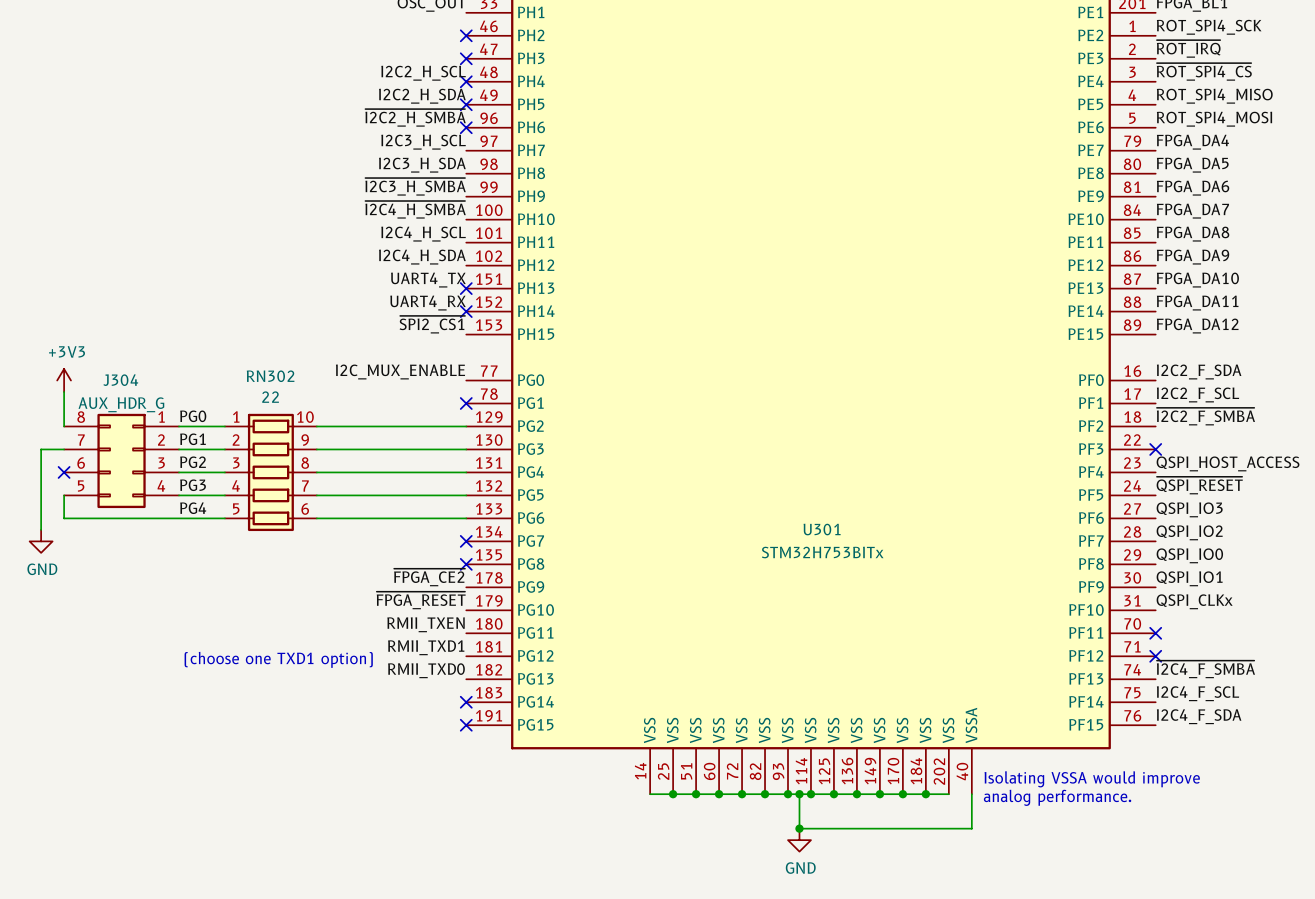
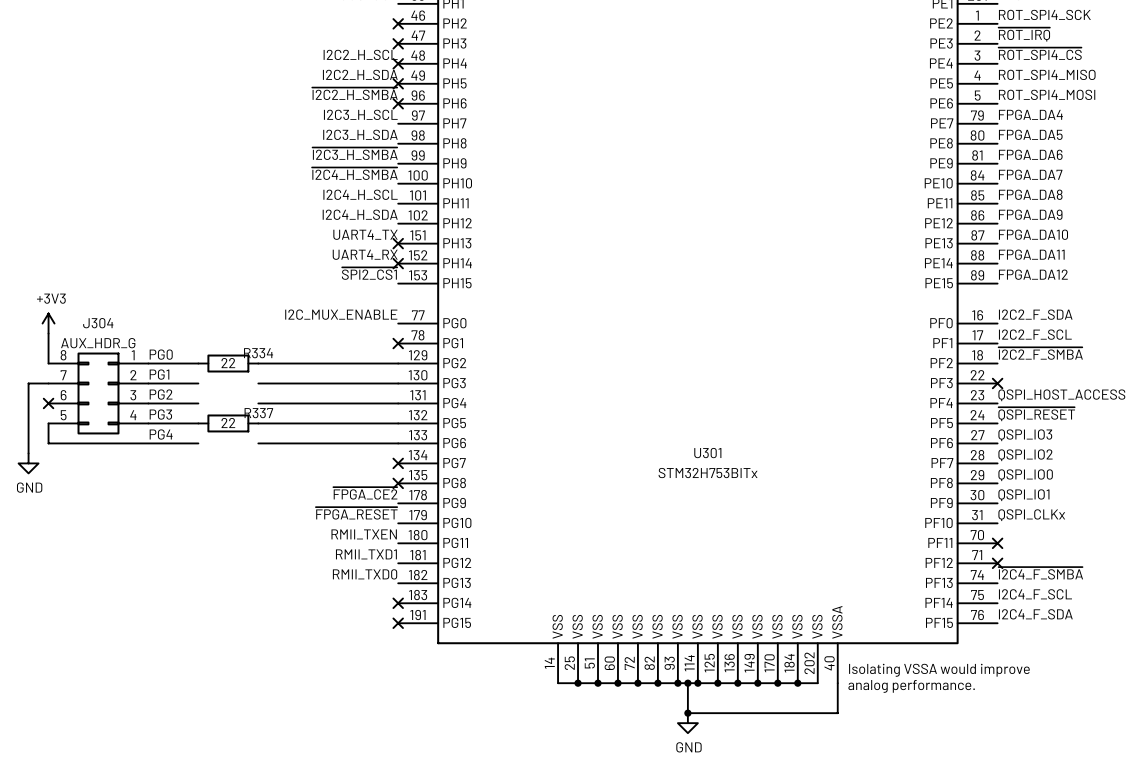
R334: none -> 22 (228, 363)
RN302: 22 (270, 472) -> none
R337: none -> 22 (228, 423)
text: (choose one TXD1 option) (278, 659) -> none

